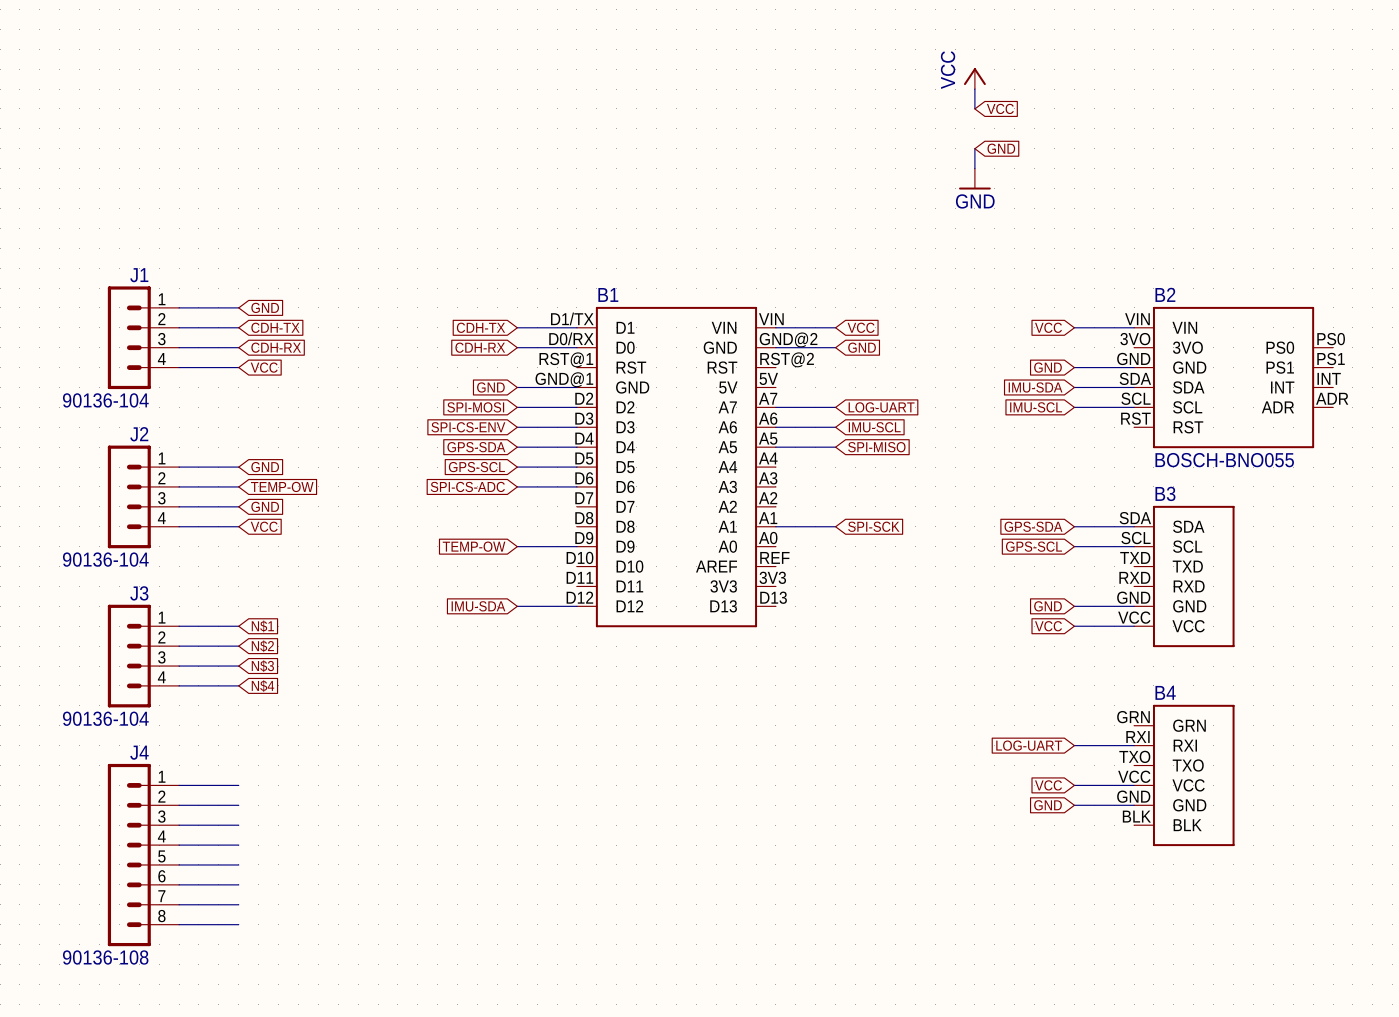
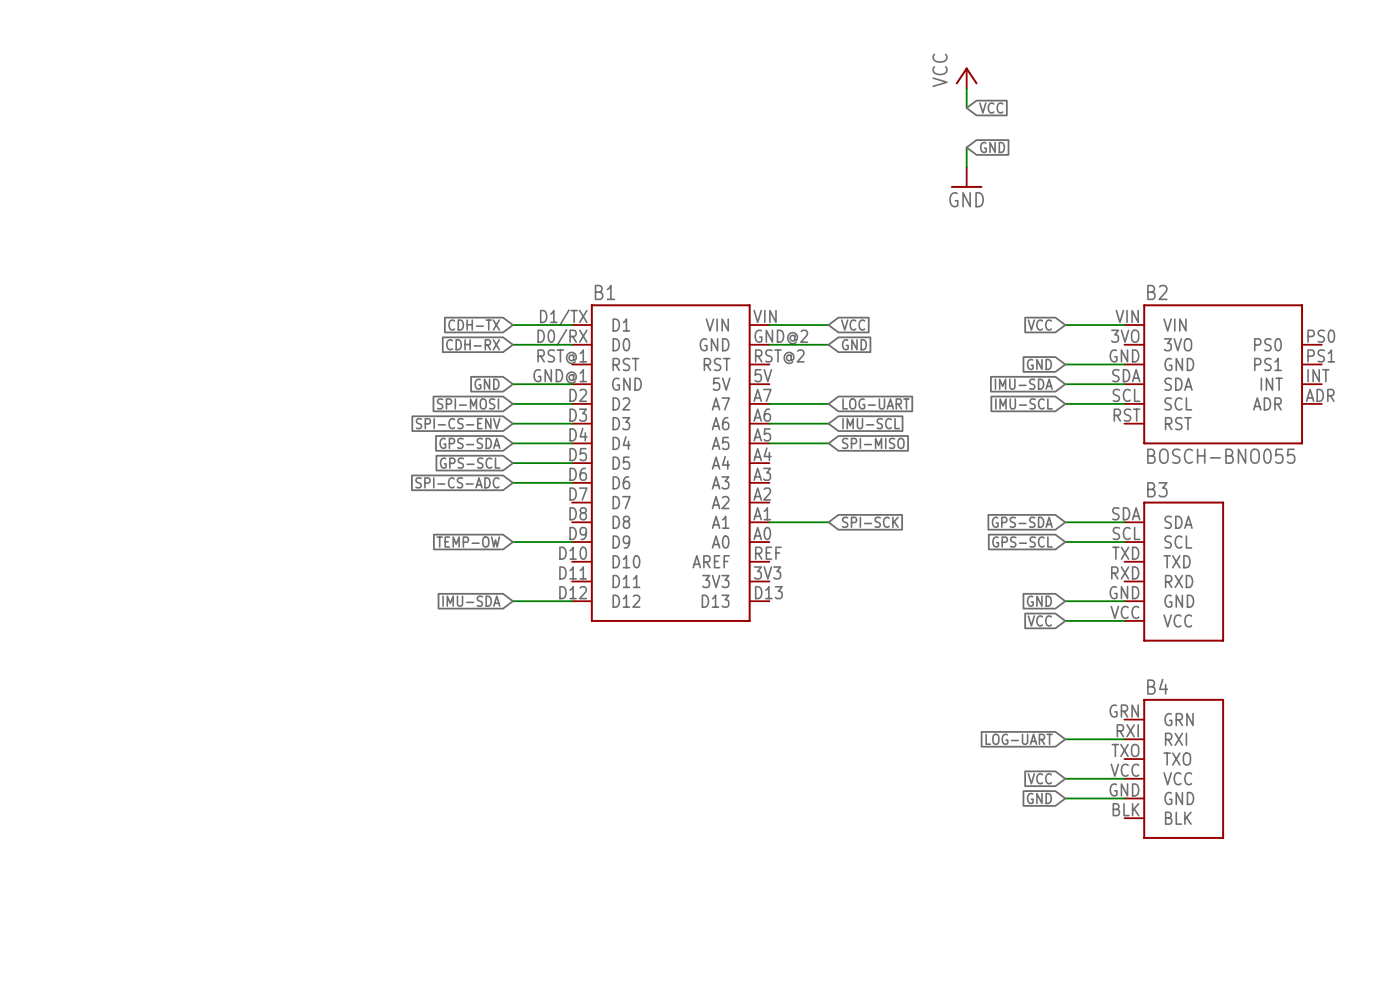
wire: (179, 307) (238, 307) -> none
global label: GND (265, 307) -> none
wire: (179, 327) (238, 327) -> none
global label: CDH-TX (275, 327) -> none
J1: 90136-104 (143, 337) -> none
wire: (179, 347) (238, 347) -> none
global label: CDH-RX (276, 347) -> none
wire: (179, 367) (238, 367) -> none
global label: VCC (264, 367) -> none
wire: (179, 467) (238, 467) -> none
global label: GND (265, 467) -> none
wire: (179, 486) (238, 486) -> none
global label: TEMP-OW (282, 486) -> none
J2: 90136-104 (143, 496) -> none
wire: (179, 506) (238, 506) -> none
global label: GND (265, 506) -> none
wire: (179, 526) (238, 526) -> none
global label: VCC (264, 526) -> none
wire: (179, 626) (238, 626) -> none
global label: N$1 (262, 626) -> none
wire: (179, 646) (238, 646) -> none
global label: N$2 (262, 646) -> none
J3: 90136-104 (143, 656) -> none
wire: (179, 666) (238, 666) -> none
global label: N$3 (262, 666) -> none
wire: (179, 685) (238, 685) -> none
global label: N$4 (262, 686) -> none
wire: (179, 785) (238, 785) -> none
wire: (179, 805) (238, 805) -> none
wire: (179, 825) (238, 825) -> none
wire: (179, 845) (238, 845) -> none
J4: 90136-108 (143, 855) -> none
wire: (179, 864) (238, 864) -> none
wire: (179, 884) (238, 884) -> none
wire: (179, 904) (238, 904) -> none
wire: (179, 924) (238, 924) -> none

